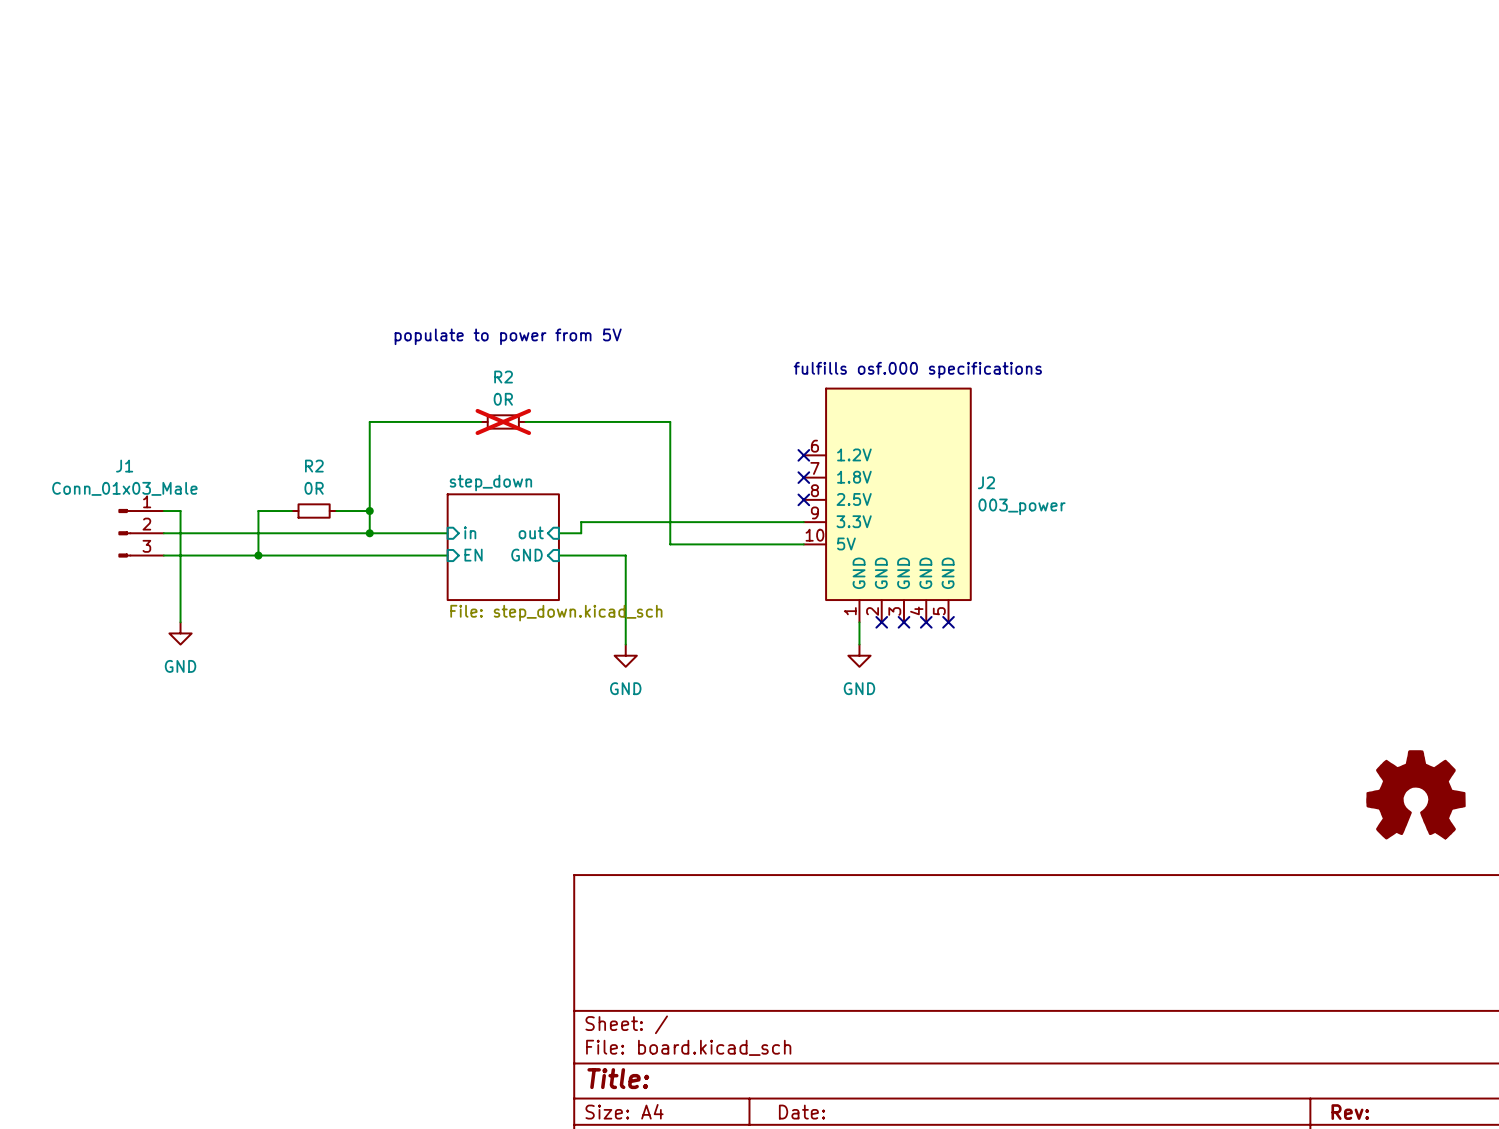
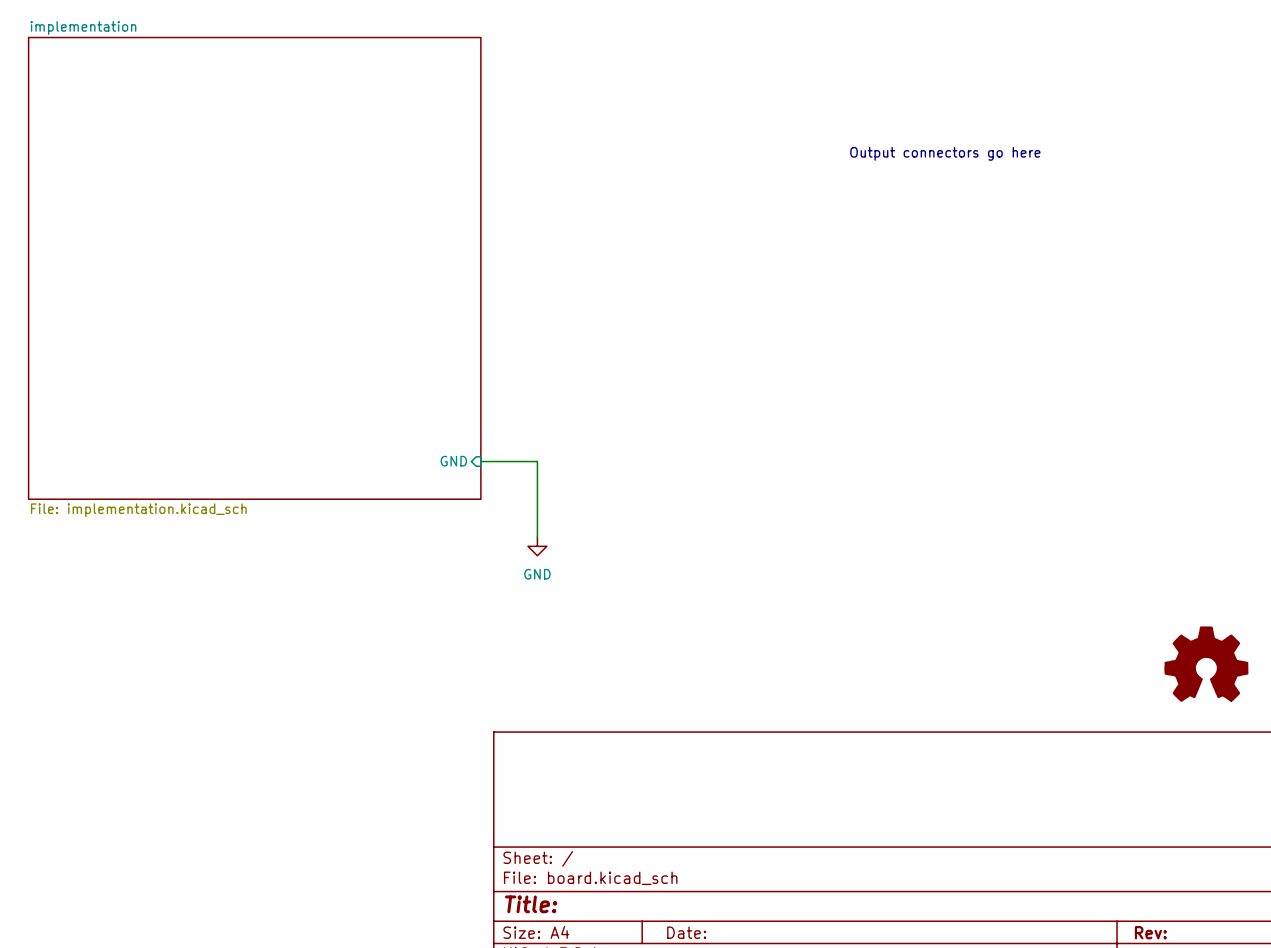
text: none -> Output connectors go here (945, 153)
sheet implementation: none -> File: implementation.kicad_sch (254, 268)
text: populate to power from 5V (508, 336) -> none
text: fulfills osf.000 specifications (917, 370) -> none
wire: (481, 421) (369, 421) (369, 533) -> none
R2: 0R (503, 421) -> none
wire: (525, 421) (670, 421) (670, 544) (803, 544) -> none
no-connect mark: (803, 455) -> none
no-connect mark: (803, 477) -> none
no-connect mark: (803, 499) -> none
J2: 003_power (887, 505) -> none
wire: (163, 511) (180, 511) (180, 622) -> none
wire: (291, 511) (258, 511) (258, 555) -> none
R2: 0R (314, 511) -> none
wire: (336, 511) (369, 511) -> none
junction: (369, 511) -> none
wire: (803, 522) (581, 522) (581, 533) (558, 533) -> none
sheet pin: in (470, 532) -> none
sheet pin: out (531, 532) -> none
J1: Conn_01x03_Male (141, 533) -> none
wire: (163, 533) (447, 533) -> none
junction: (369, 533) -> none
sheet step_down: File: step_down.kicad_sch (503, 547) -> none
wire: (163, 555) (447, 555) -> none
junction: (258, 555) -> none
sheet pin: EN (473, 555) -> none
wire: (859, 622) (859, 644) -> none
no-connect mark: (881, 622) -> none
no-connect mark: (903, 622) -> none
no-connect mark: (926, 622) -> none
no-connect mark: (948, 622) -> none
power symbol: GND (180, 633) -> none
power symbol: GND (859, 655) -> none

